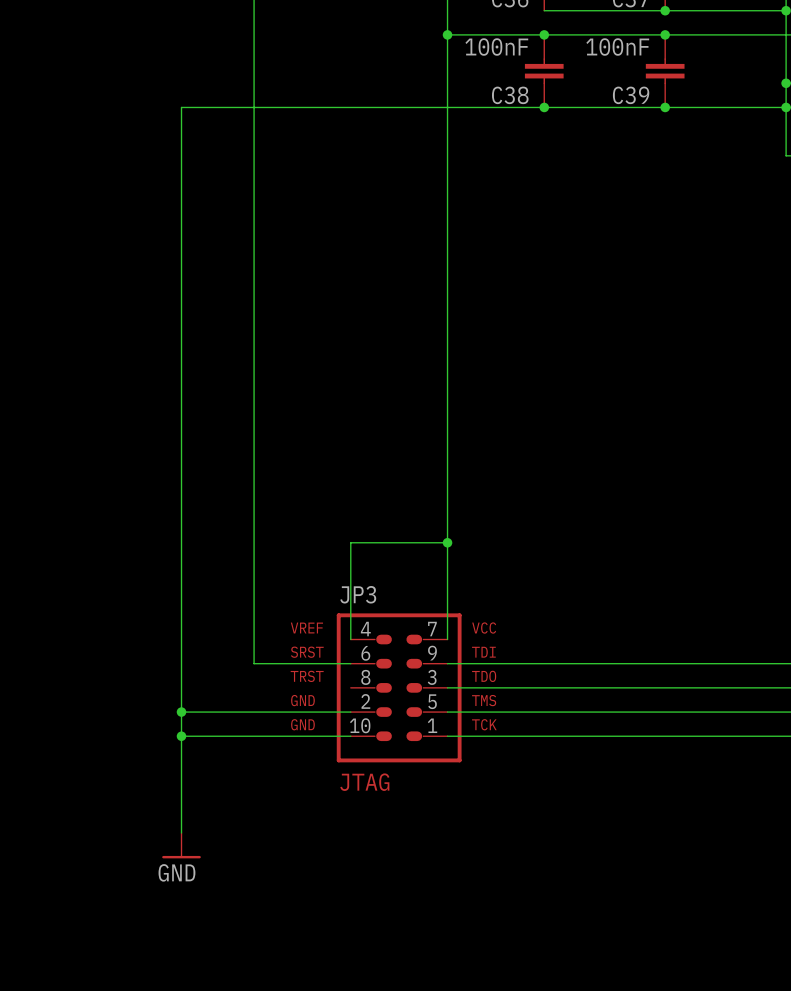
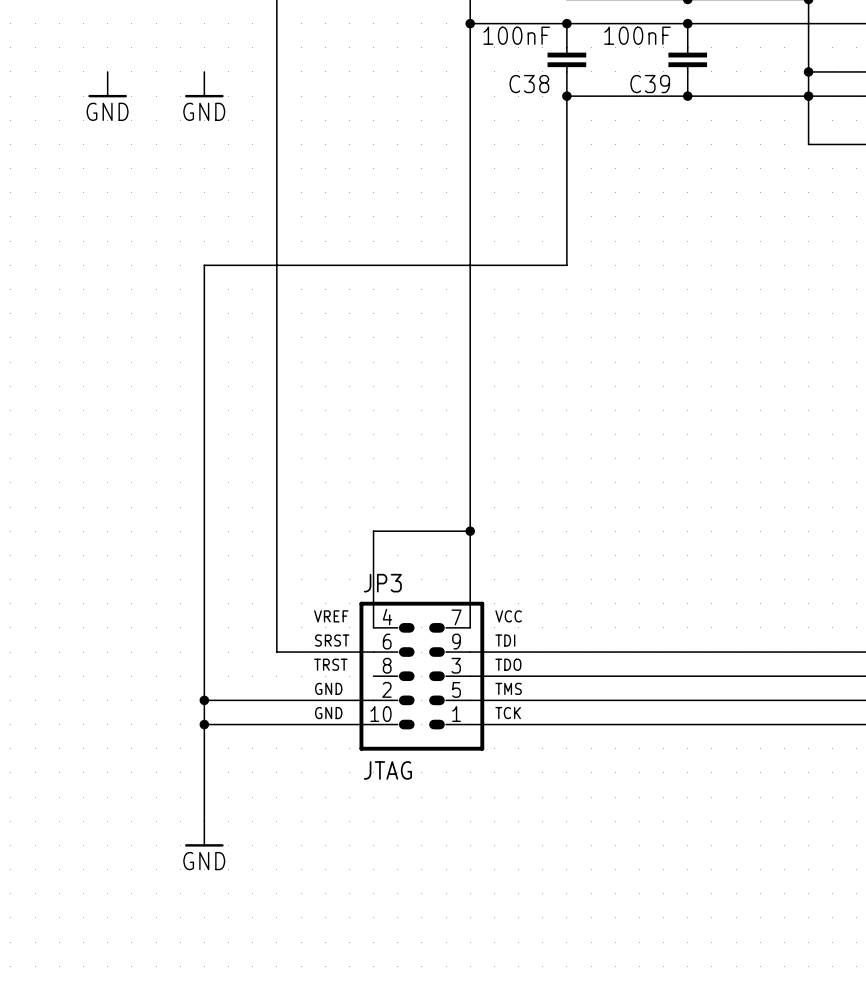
power symbol: none -> GND (107, 84)
power symbol: none -> GND (204, 84)
wire: (544, 107) (181, 107) (181, 276) -> (566, 96) (566, 265) (204, 265)

